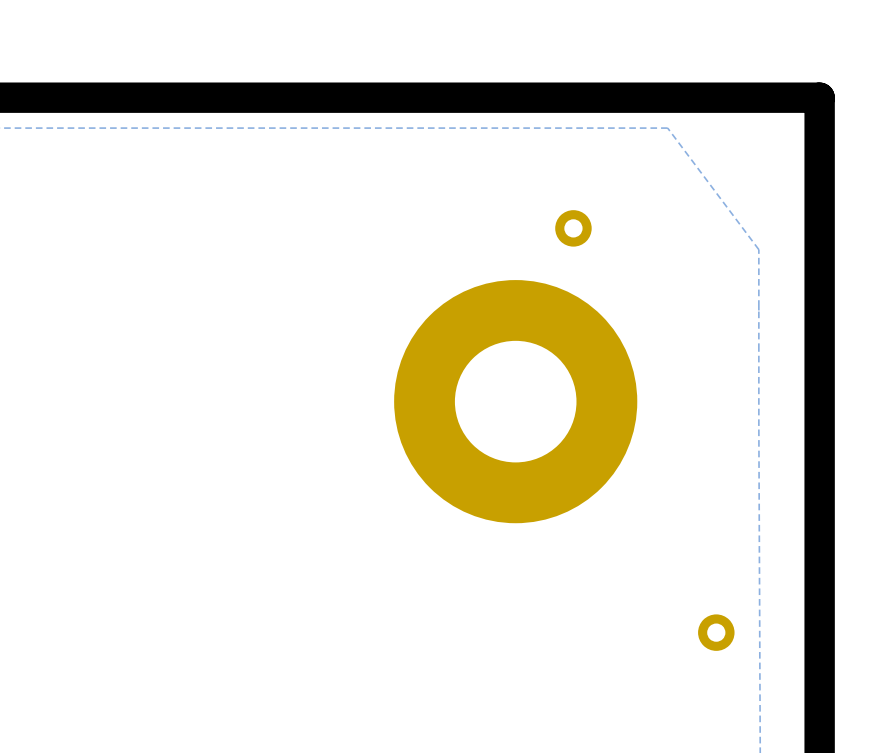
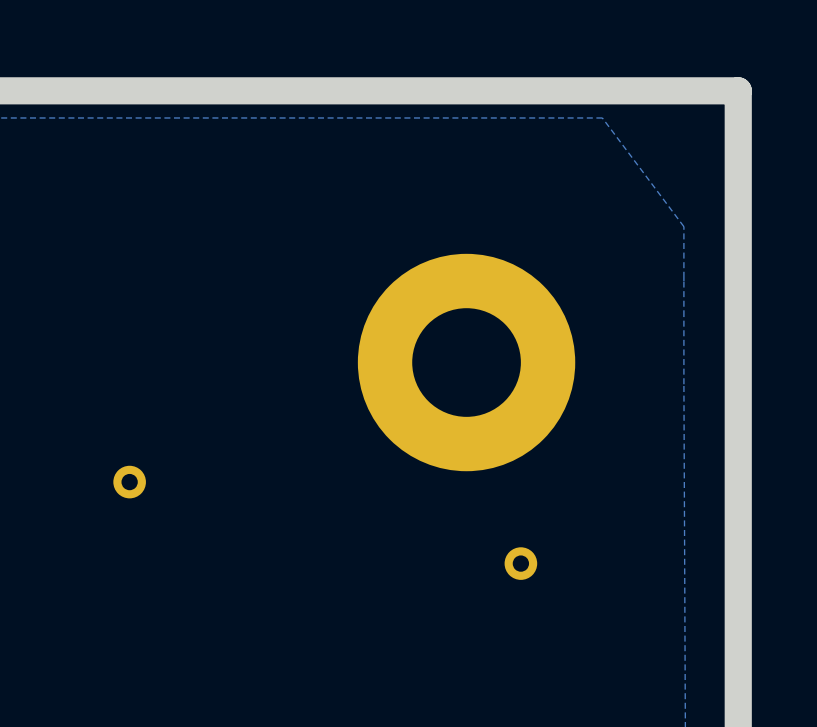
part: (573, 228) -> none
part: none -> (129, 482)
part position: (716, 632) -> (520, 563)

